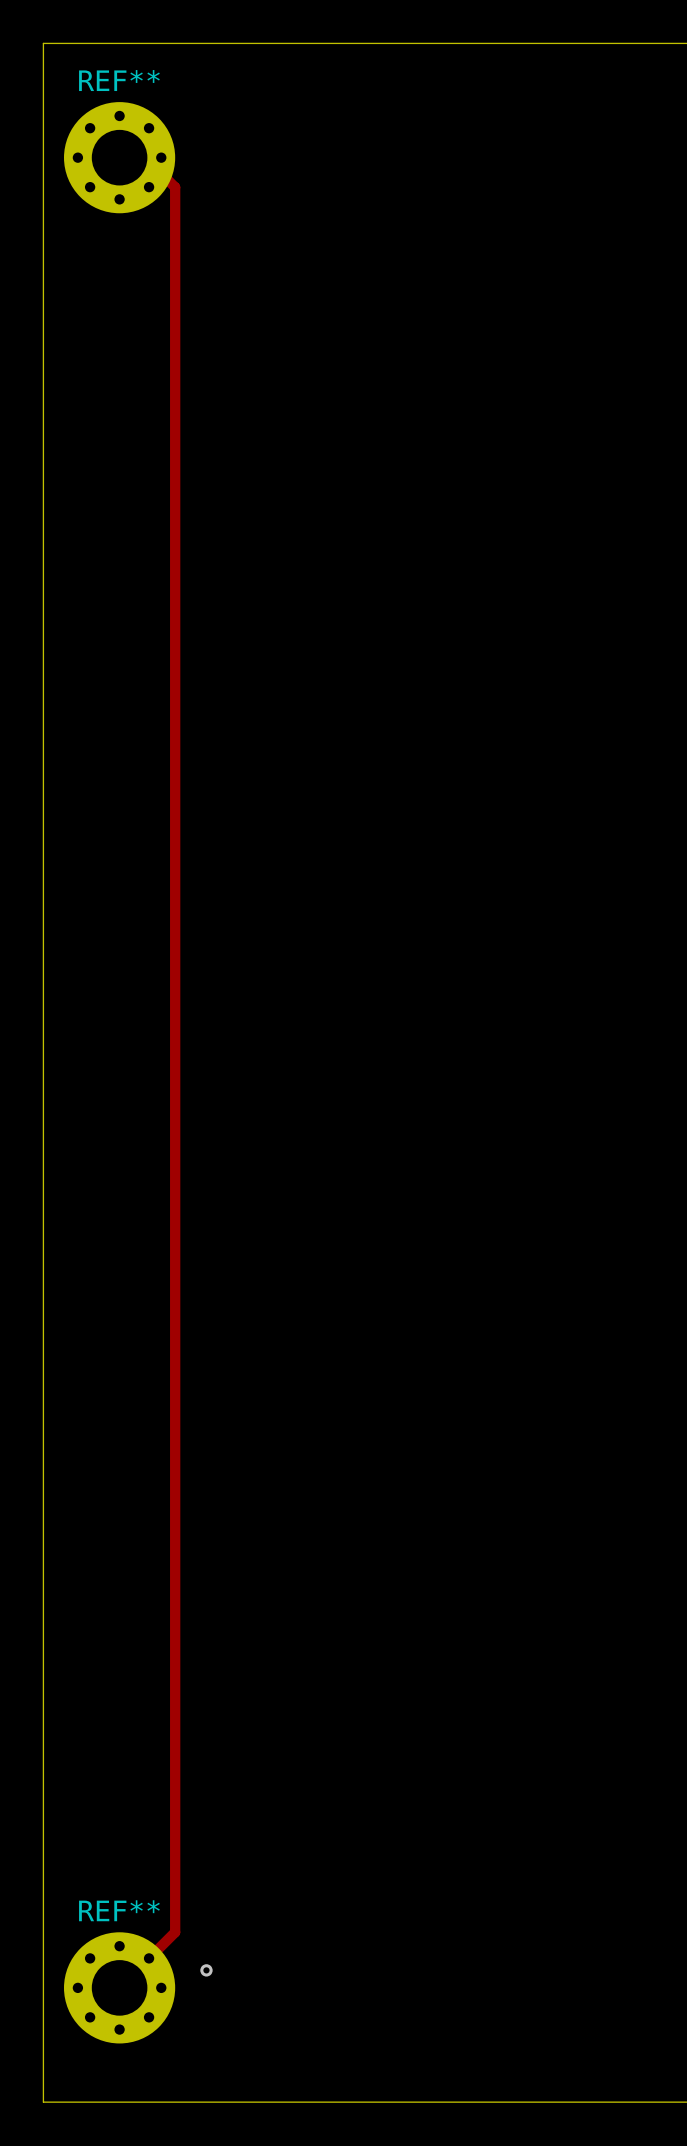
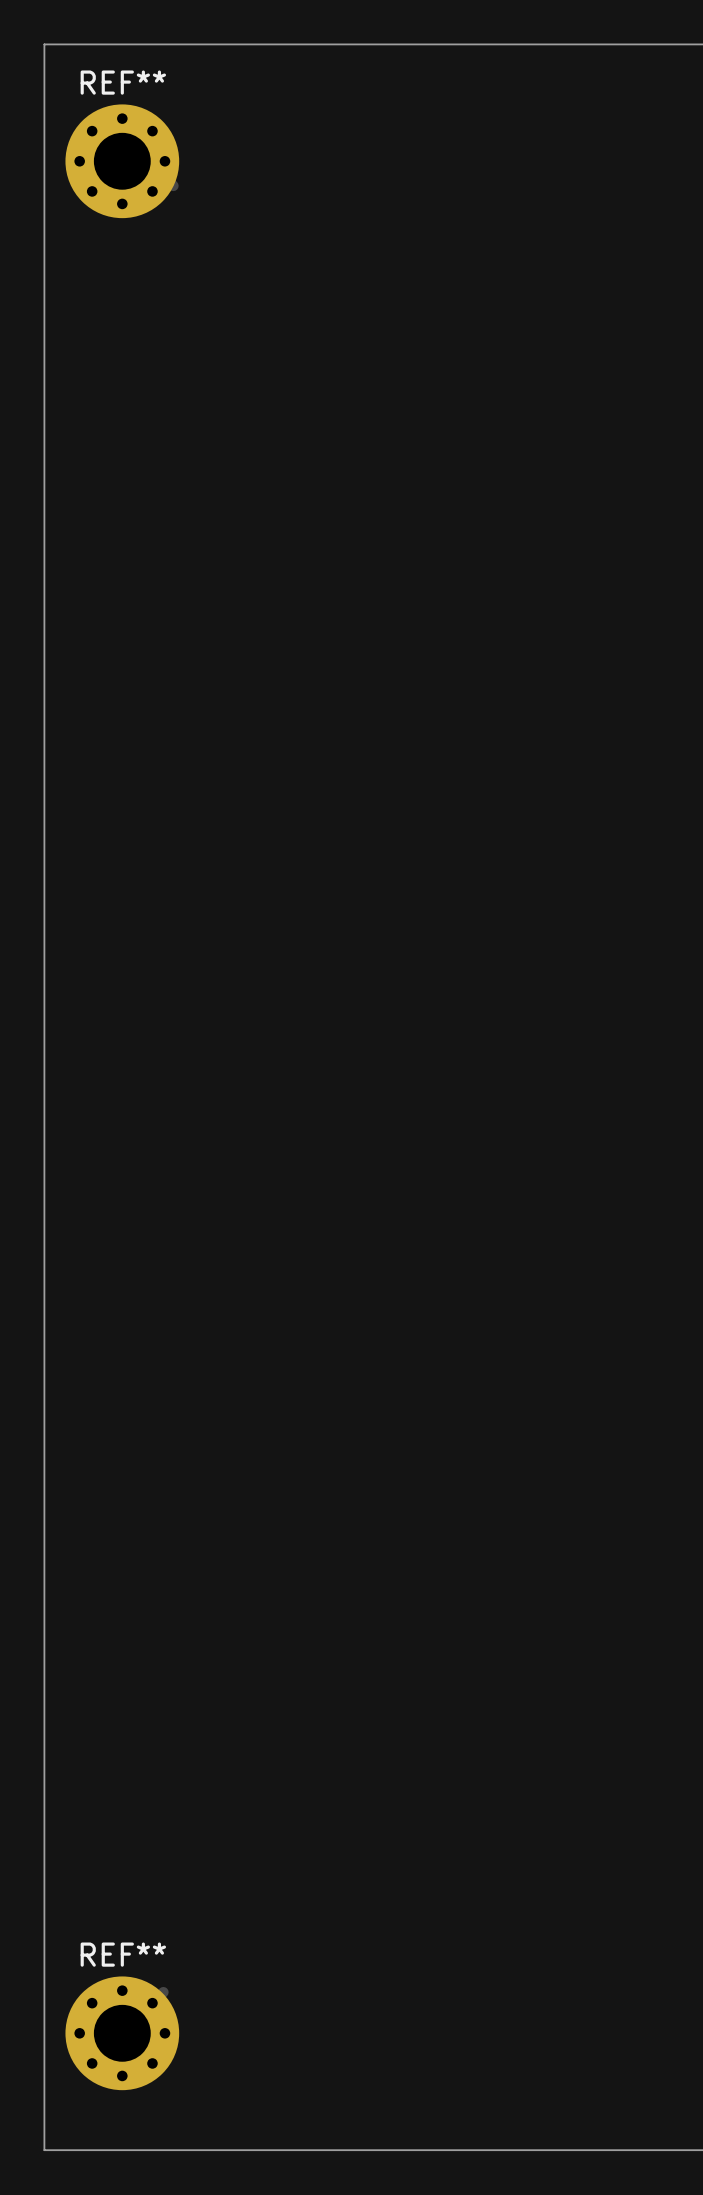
track: (169, 181) (175, 187) (175, 1932) (159, 1947) -> none
via: (206, 1970) -> none

